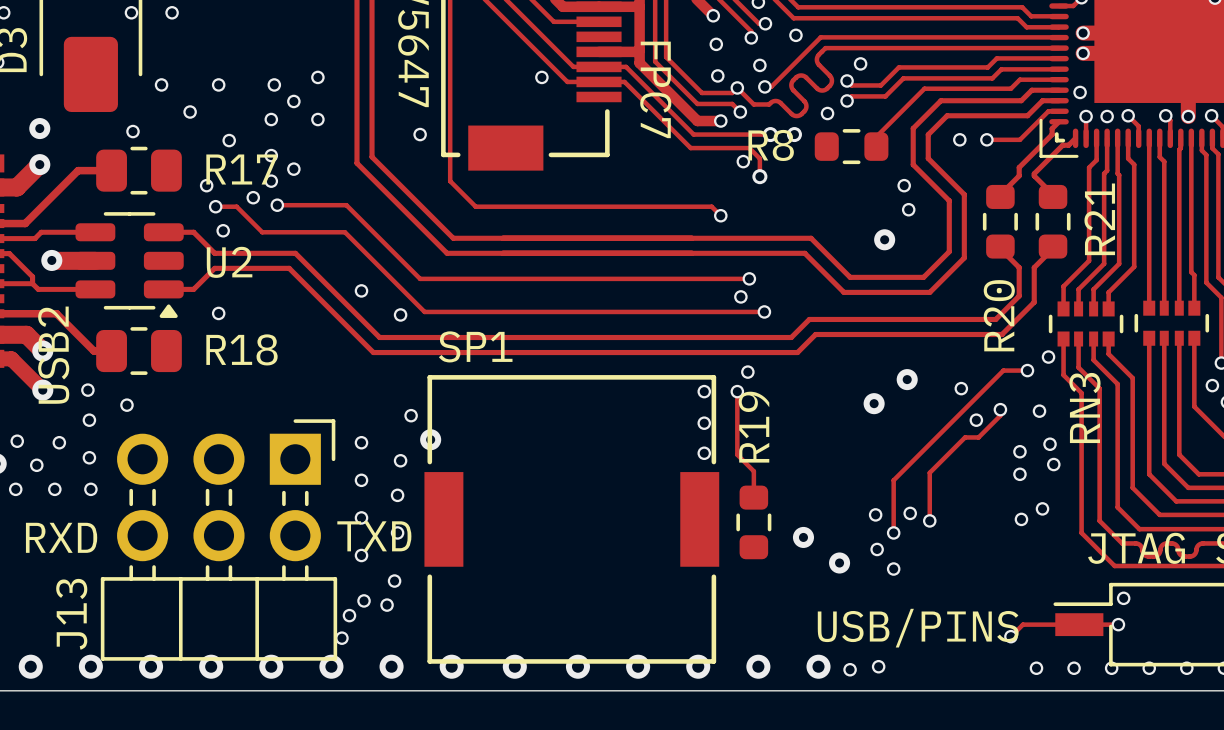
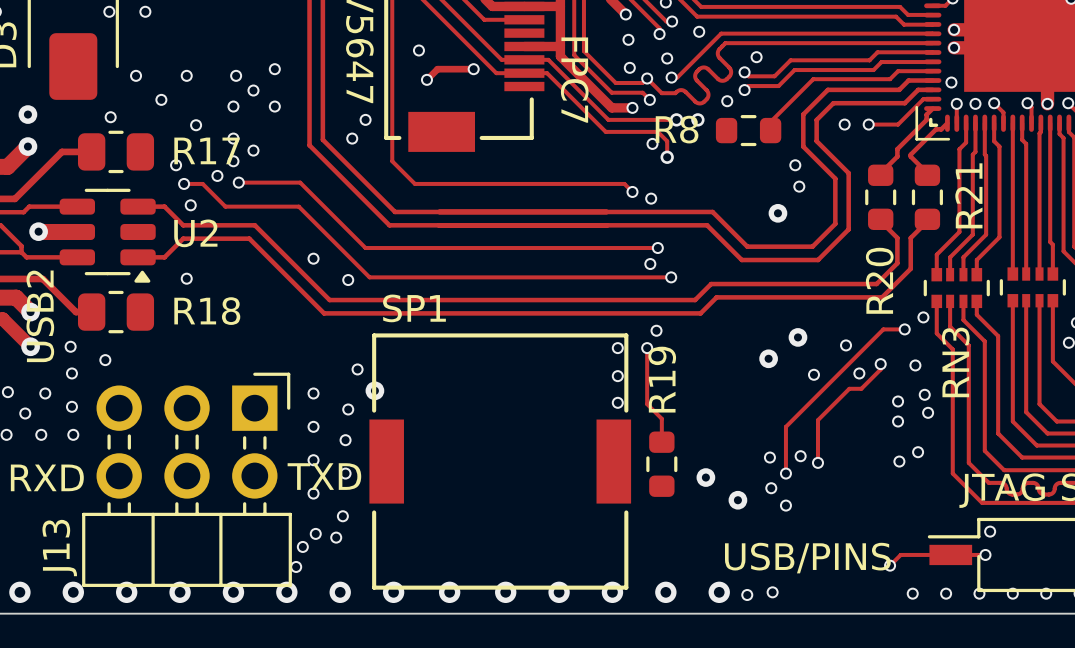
via: none -> (418, 50)
track: none -> (473, 69) (437, 69) (426, 79)
via: none -> (426, 79)
via: none -> (352, 138)
via: none -> (651, 198)
via: none -> (813, 374)

